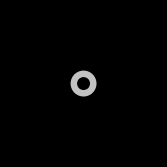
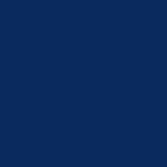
via: (83, 83) -> none

